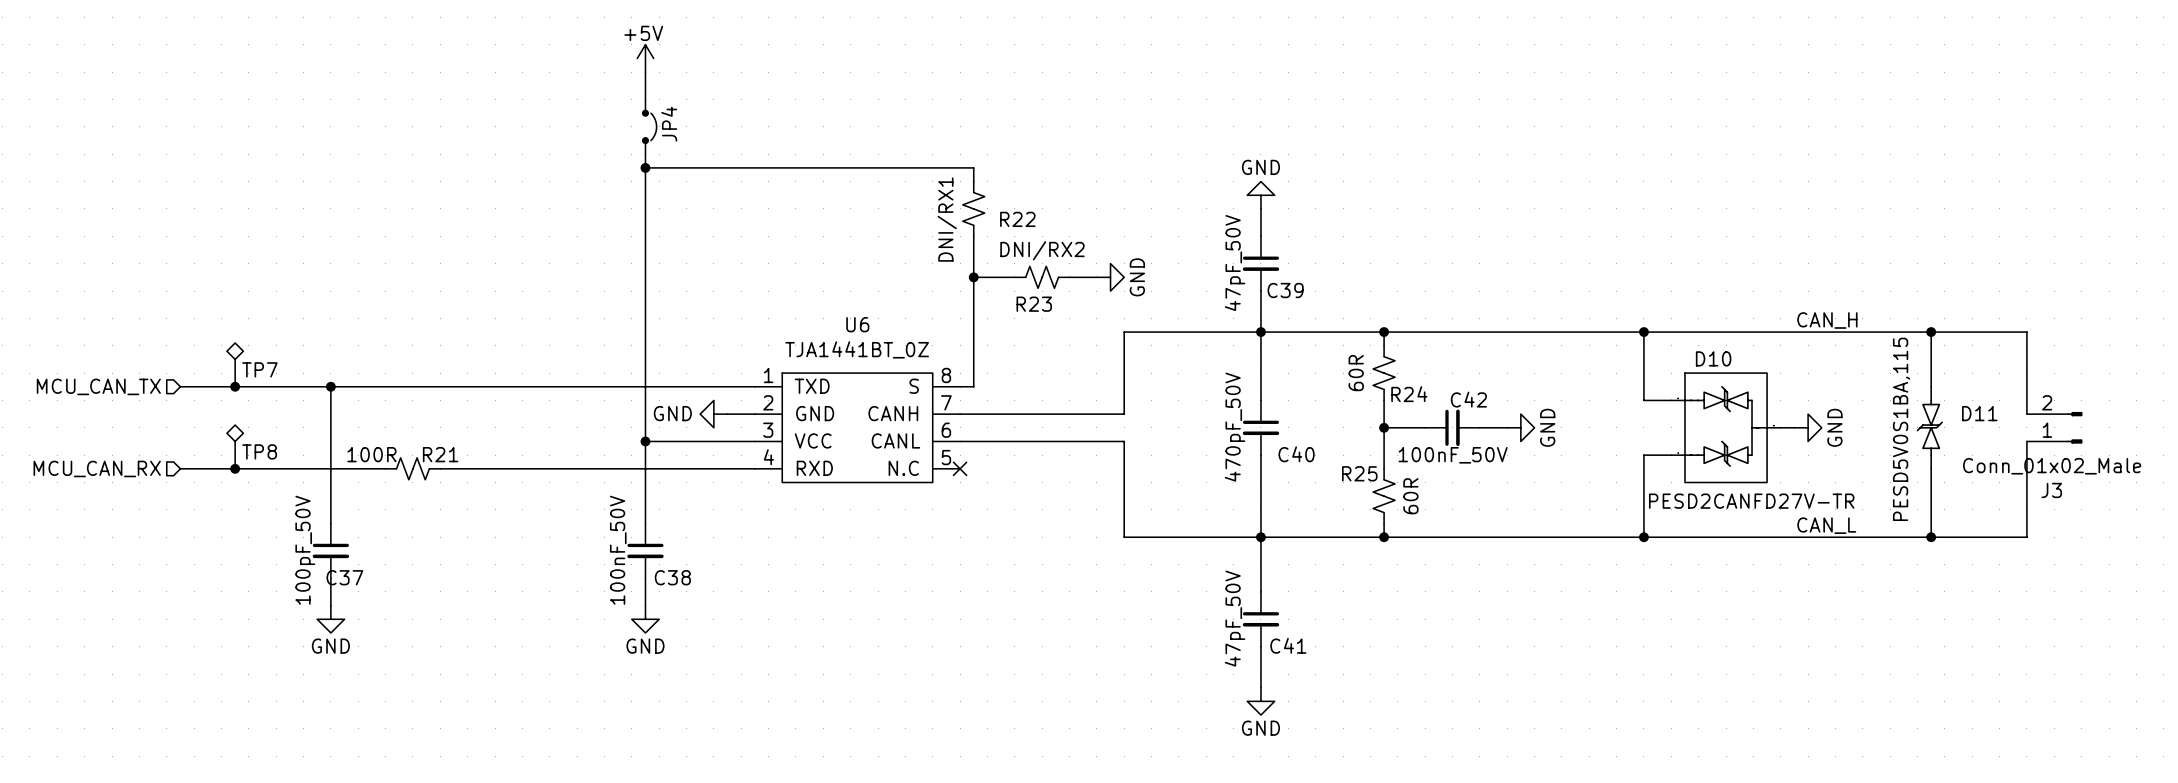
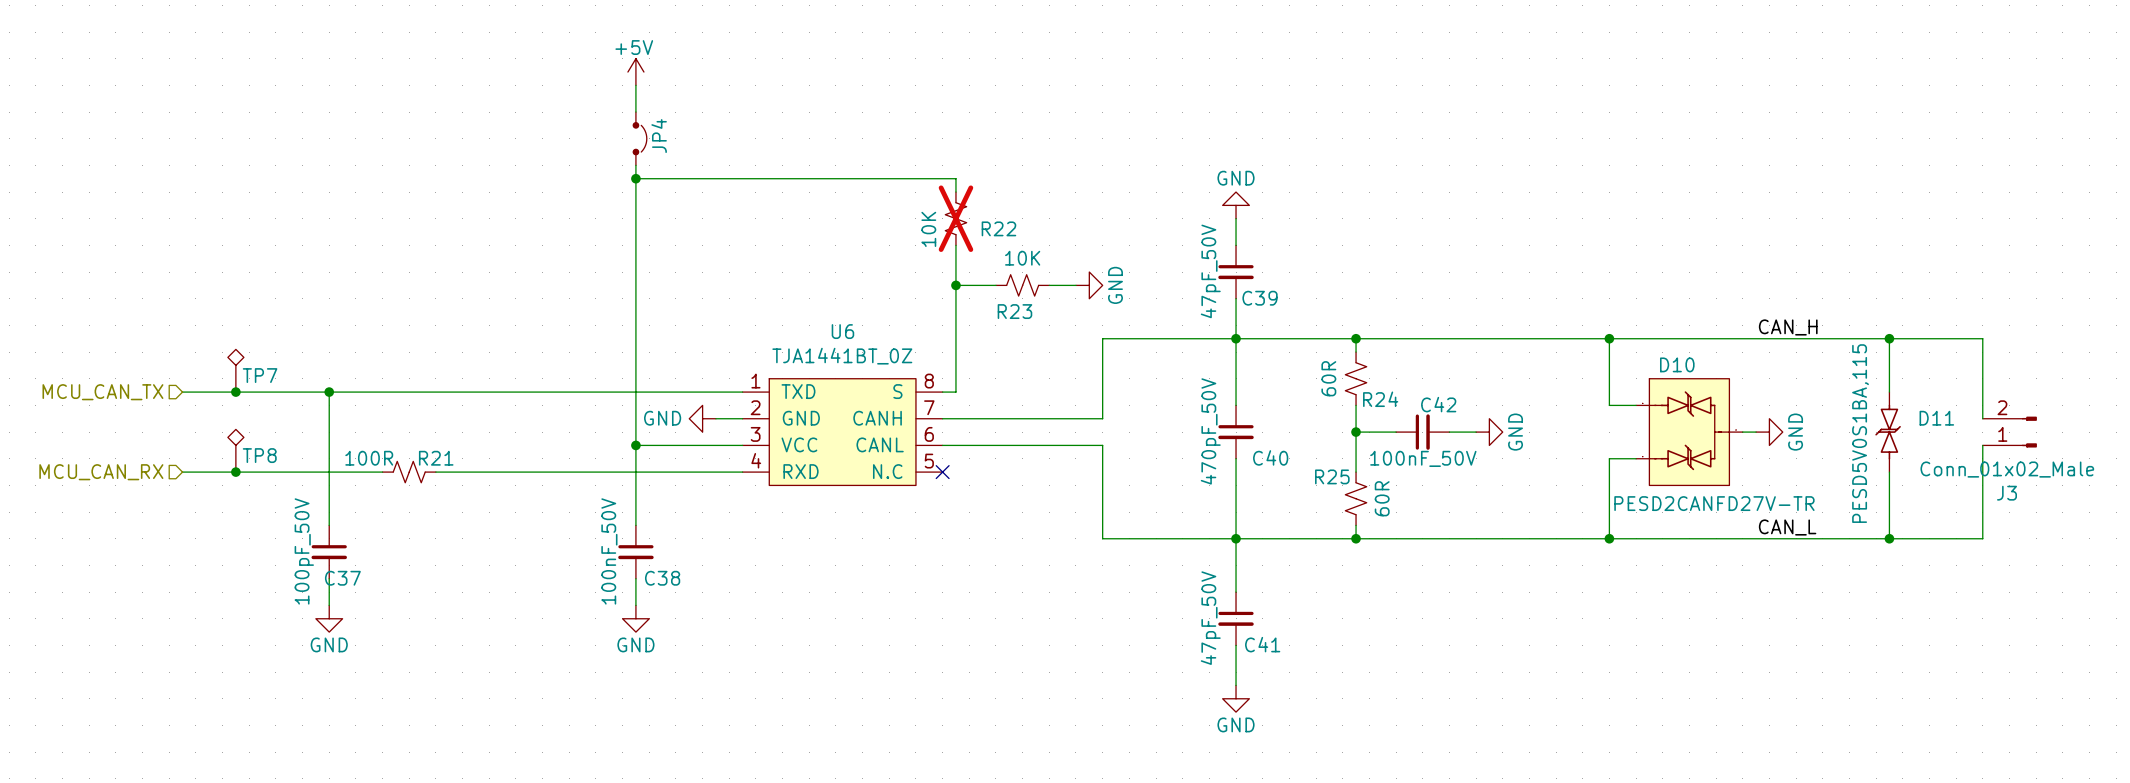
R22 do-not-place cross: none -> (955, 218)
R22 value: DNI/RX1 (947, 219) -> 10K (928, 229)
R23 value: DNI/RX2 (1042, 250) -> 10K (1022, 258)

